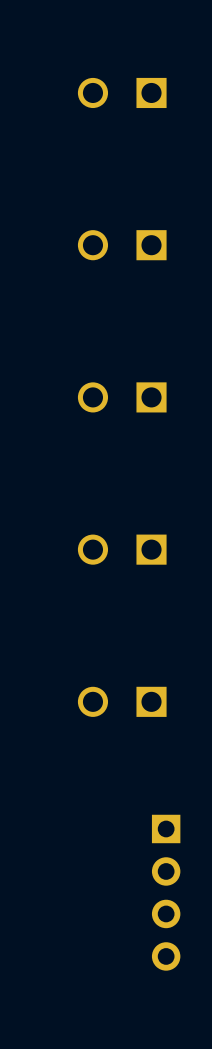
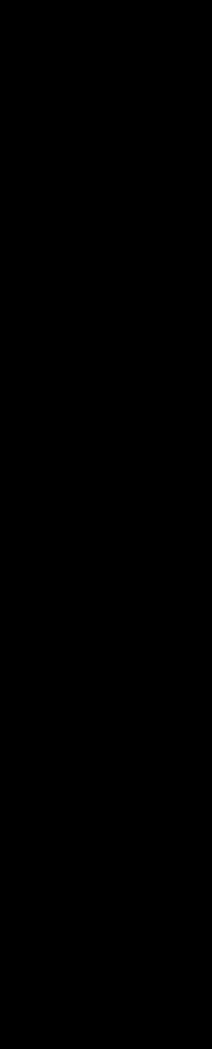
part: (122, 92) -> none
part: (122, 245) -> none
part: (122, 397) -> none
part: (122, 549) -> none
part: (122, 701) -> none
part: (166, 892) -> none

